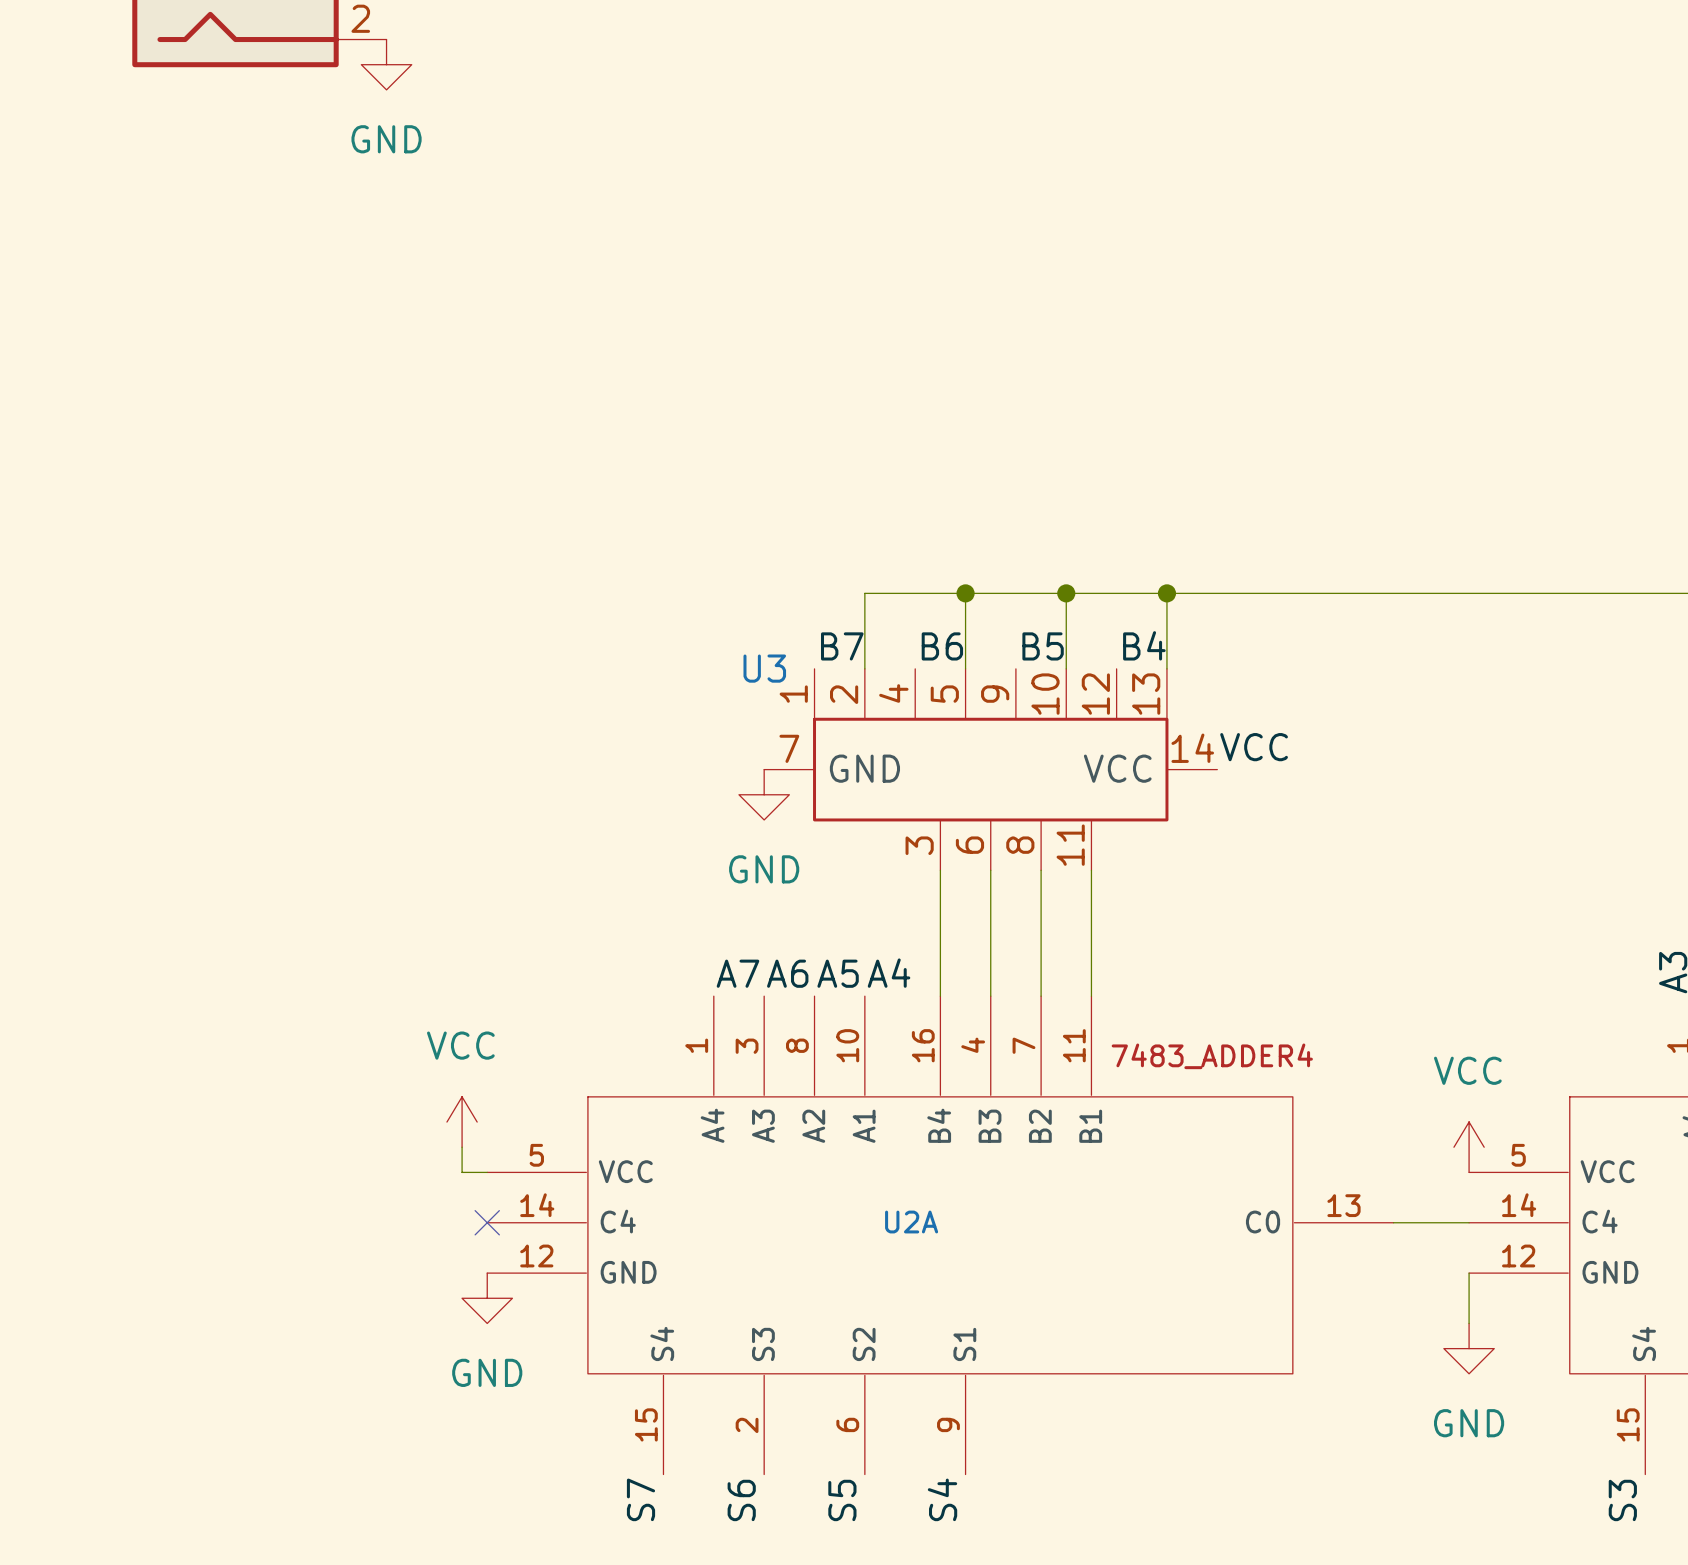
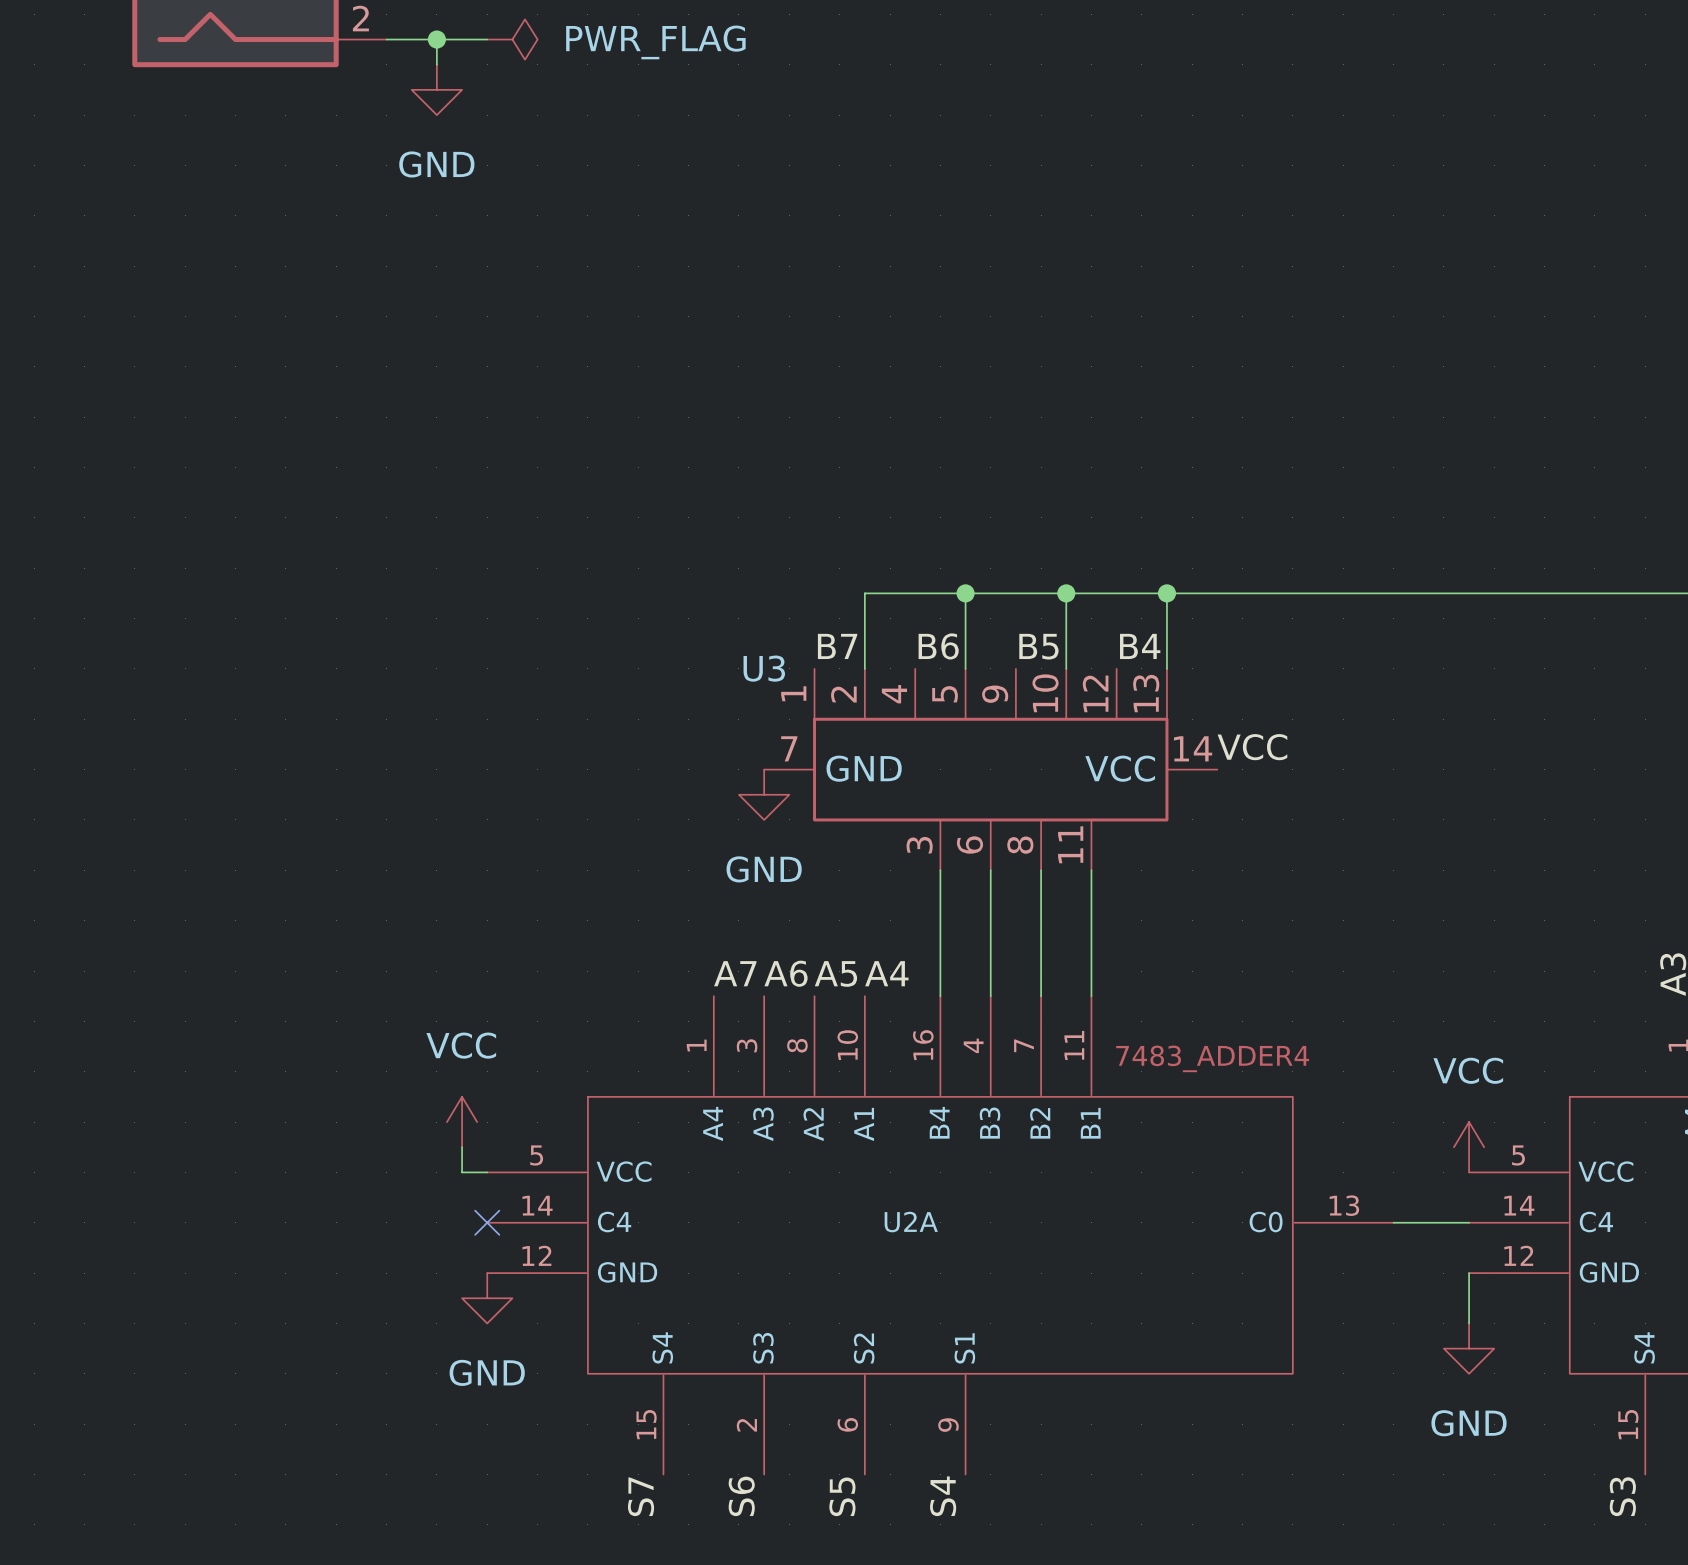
wire: none -> (386, 39) (487, 39)
wire: none -> (436, 39) (436, 64)
junction: none -> (436, 39)
power symbol: none -> PWR_FLAG (512, 39)
power symbol position: GND (386, 64) -> GND (436, 89)

